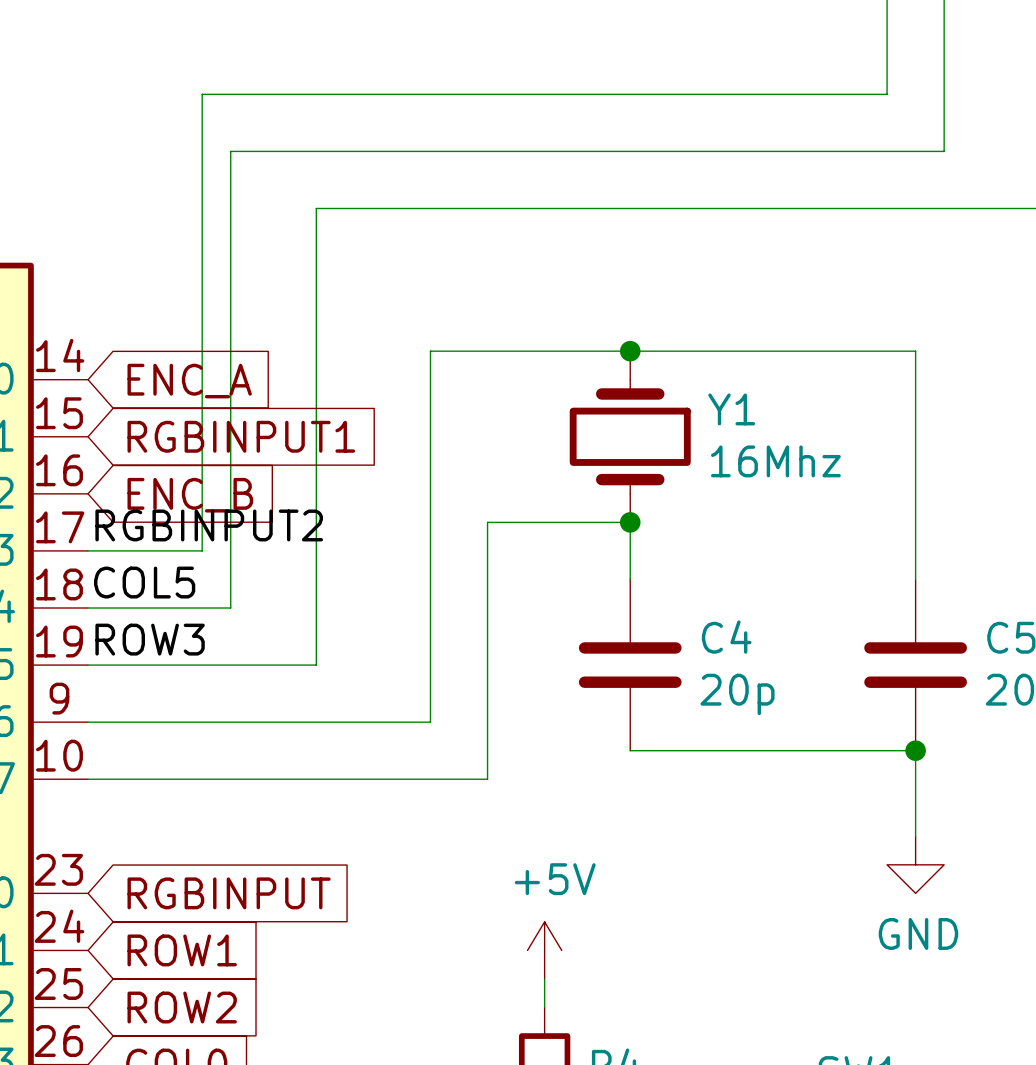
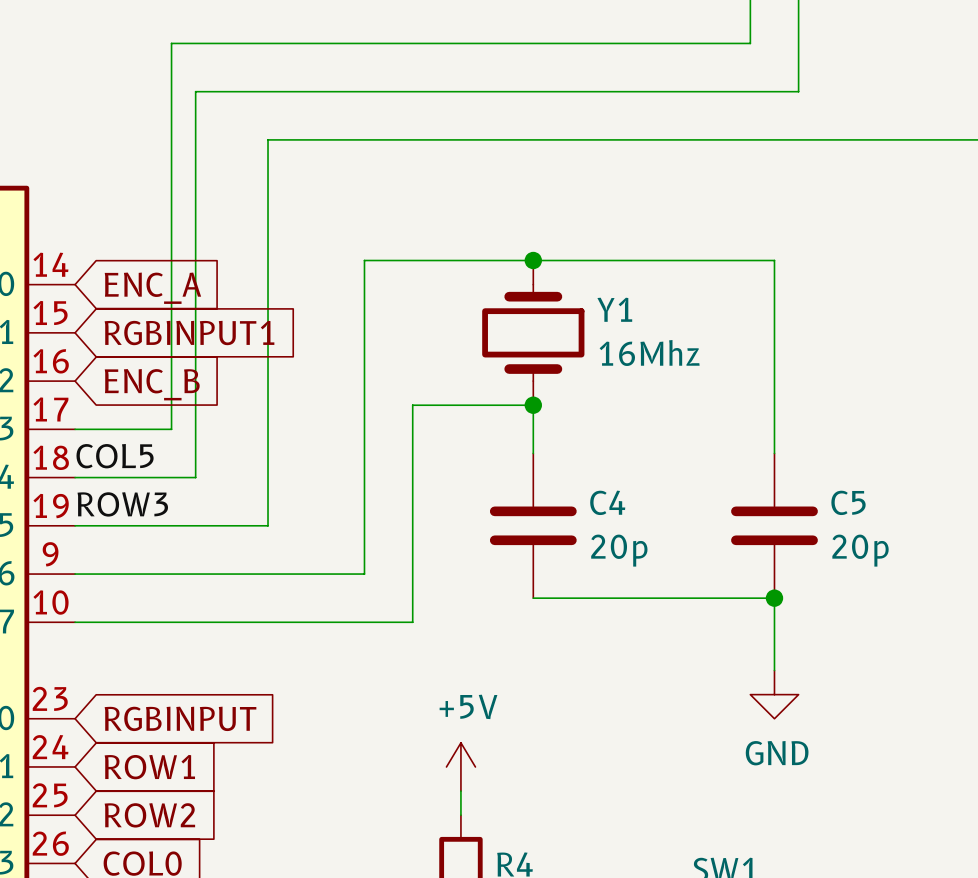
label: RGBINPUT2 (209, 525) -> none

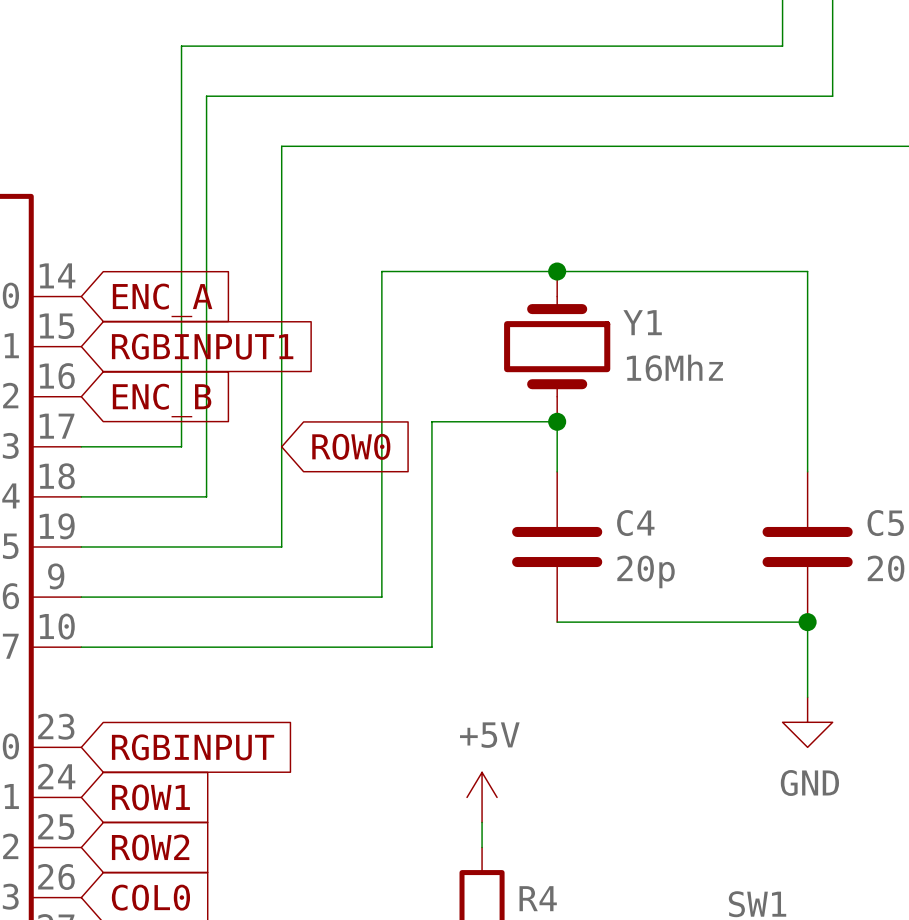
global label: none -> ROW0 (351, 446)
label: COL5 (115, 456) -> none
label: ROW3 (122, 504) -> none

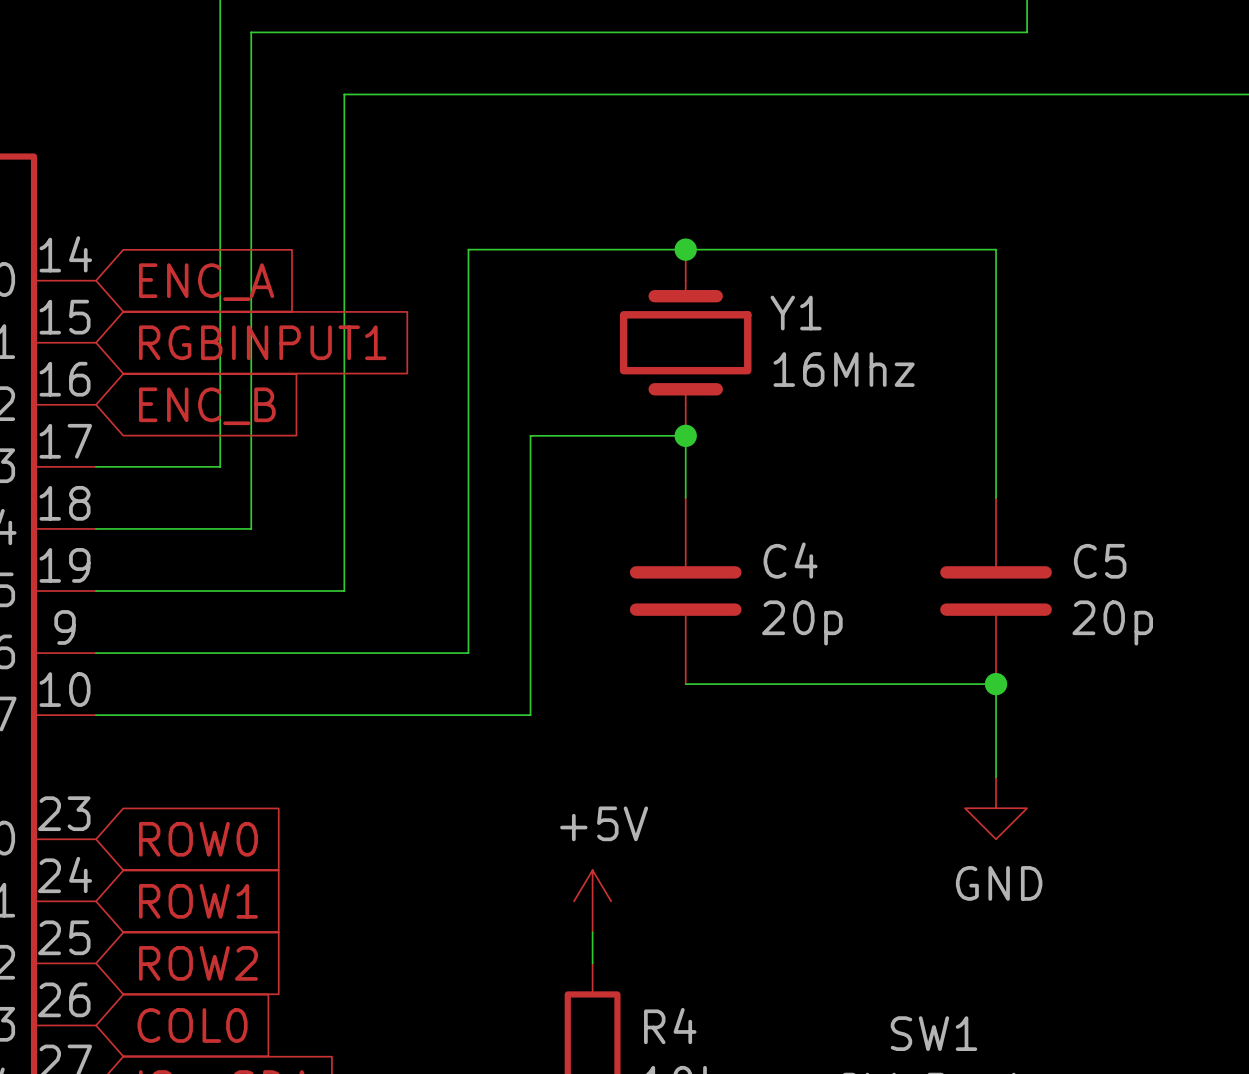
global label: ROW0 (351, 446) -> none
global label: RGBINPUT (193, 747) -> ROW0 (198, 839)

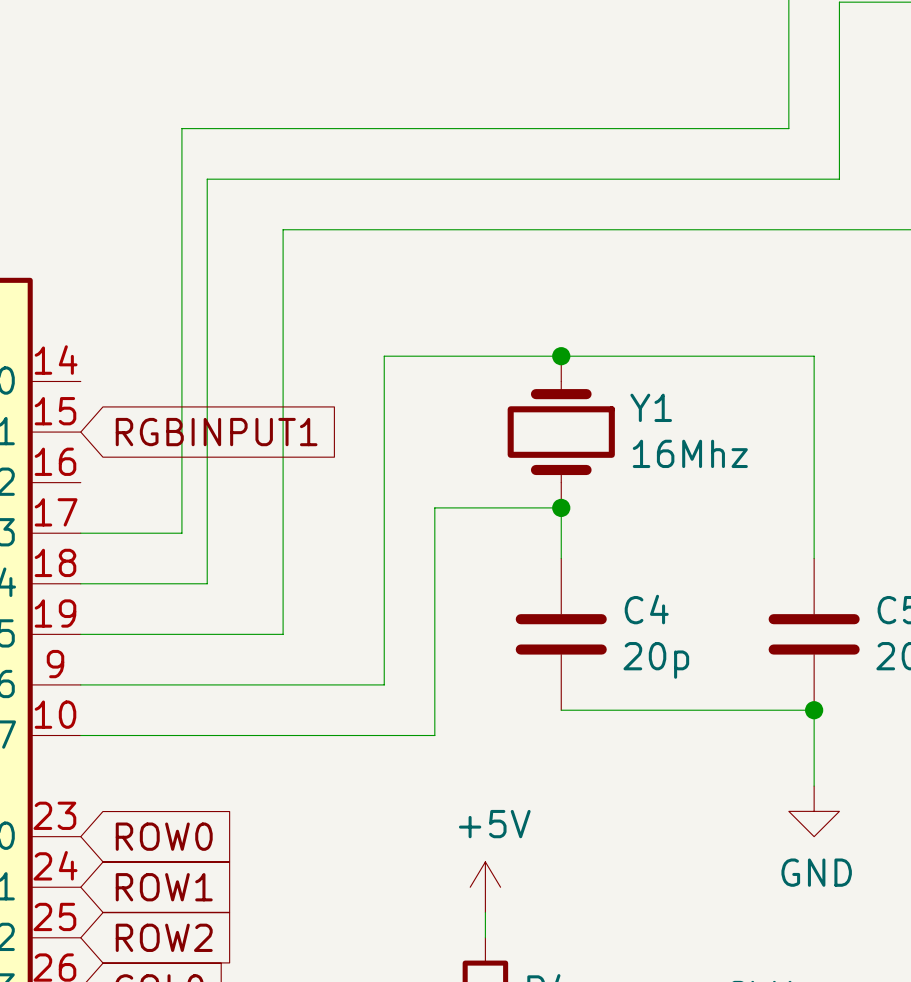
global label: ENC_A (206, 282) -> none
global label: ENC_B (207, 406) -> none

